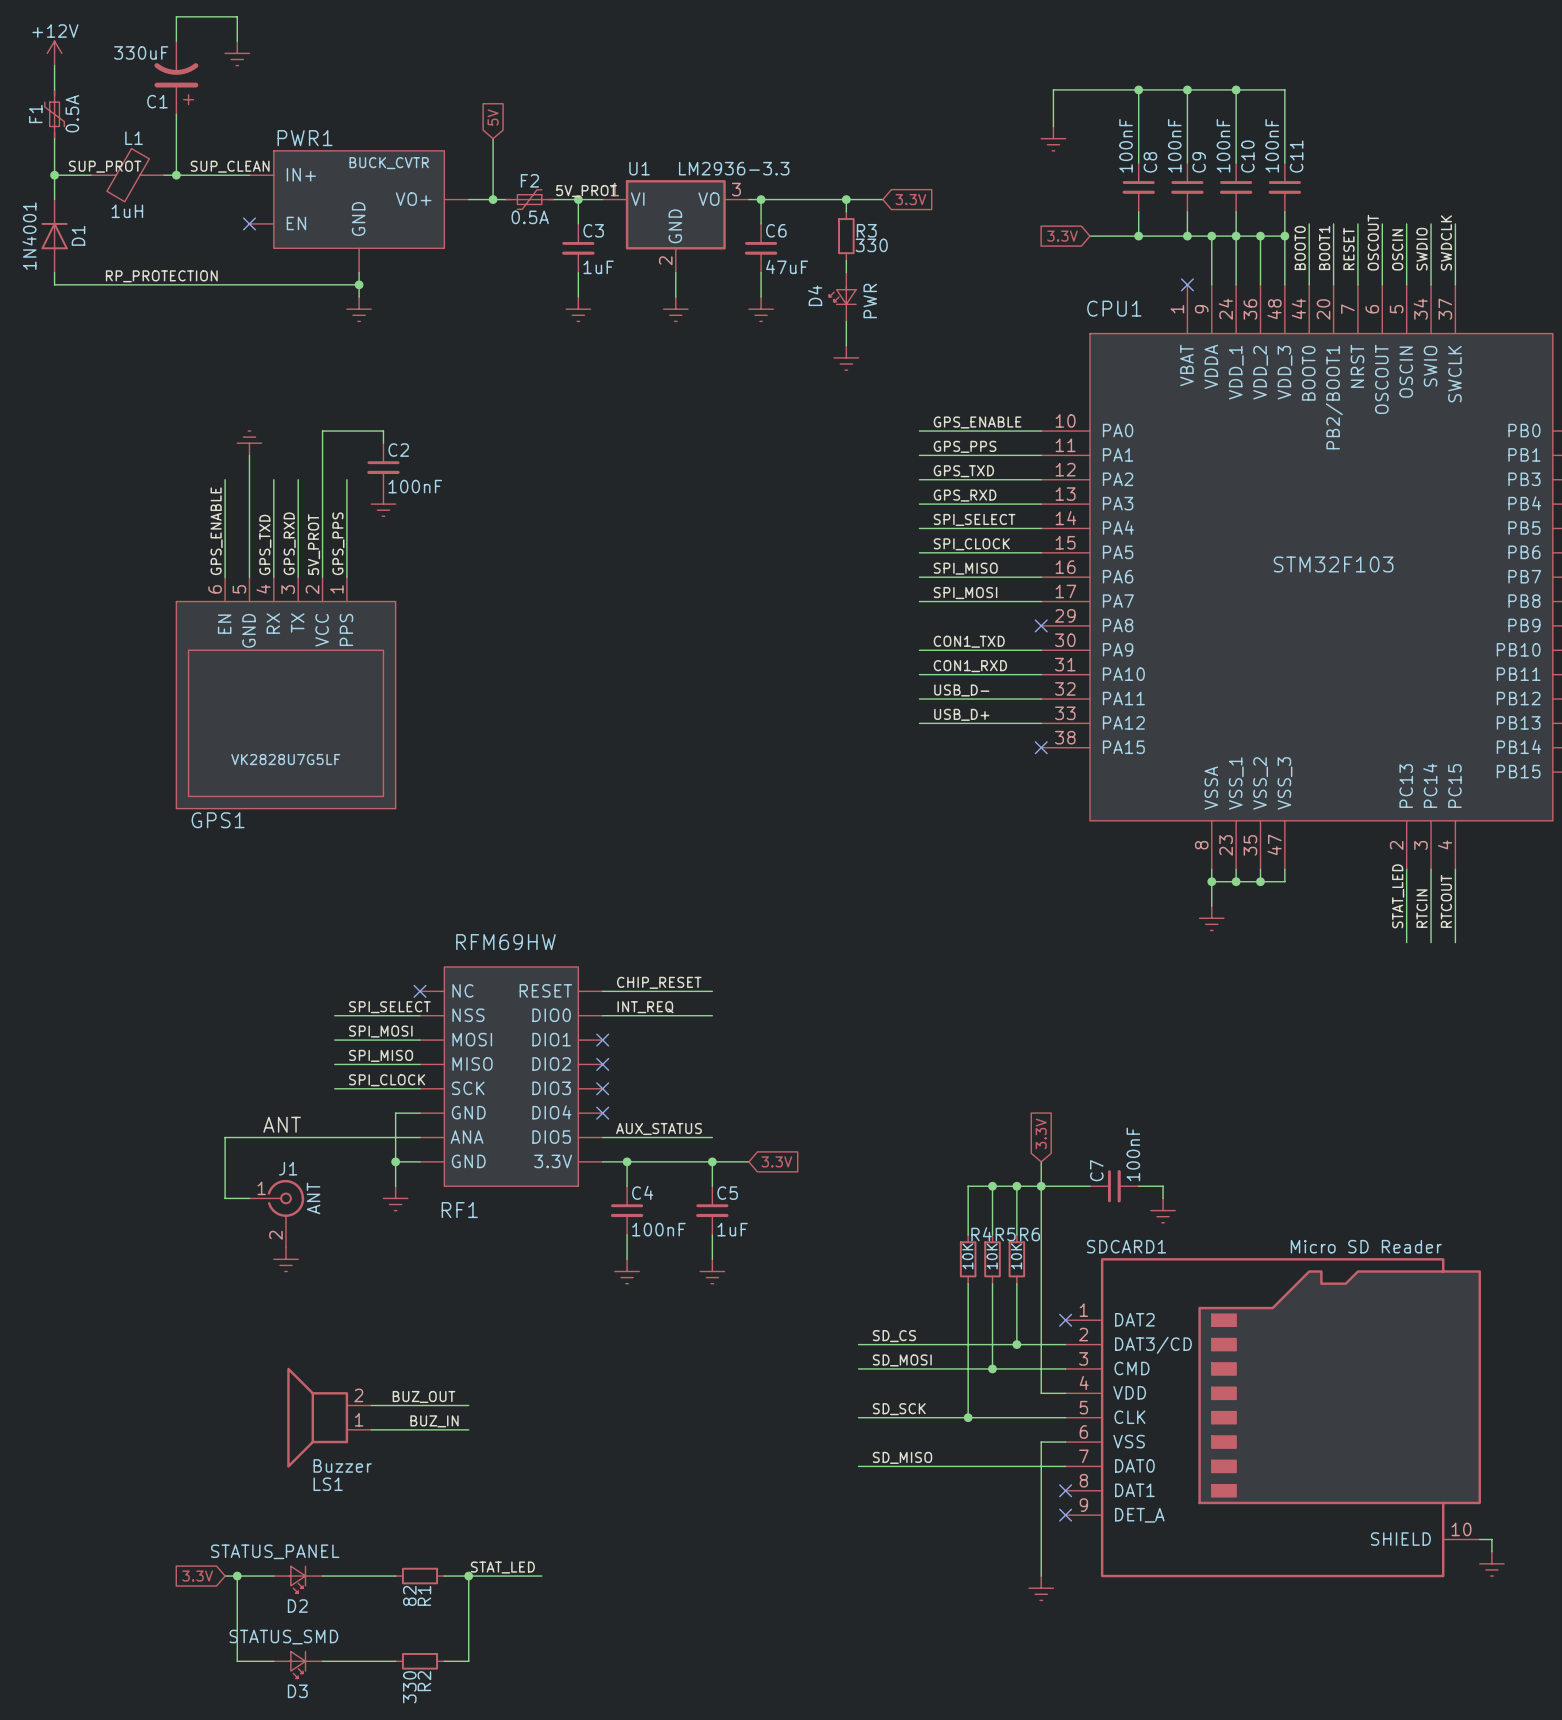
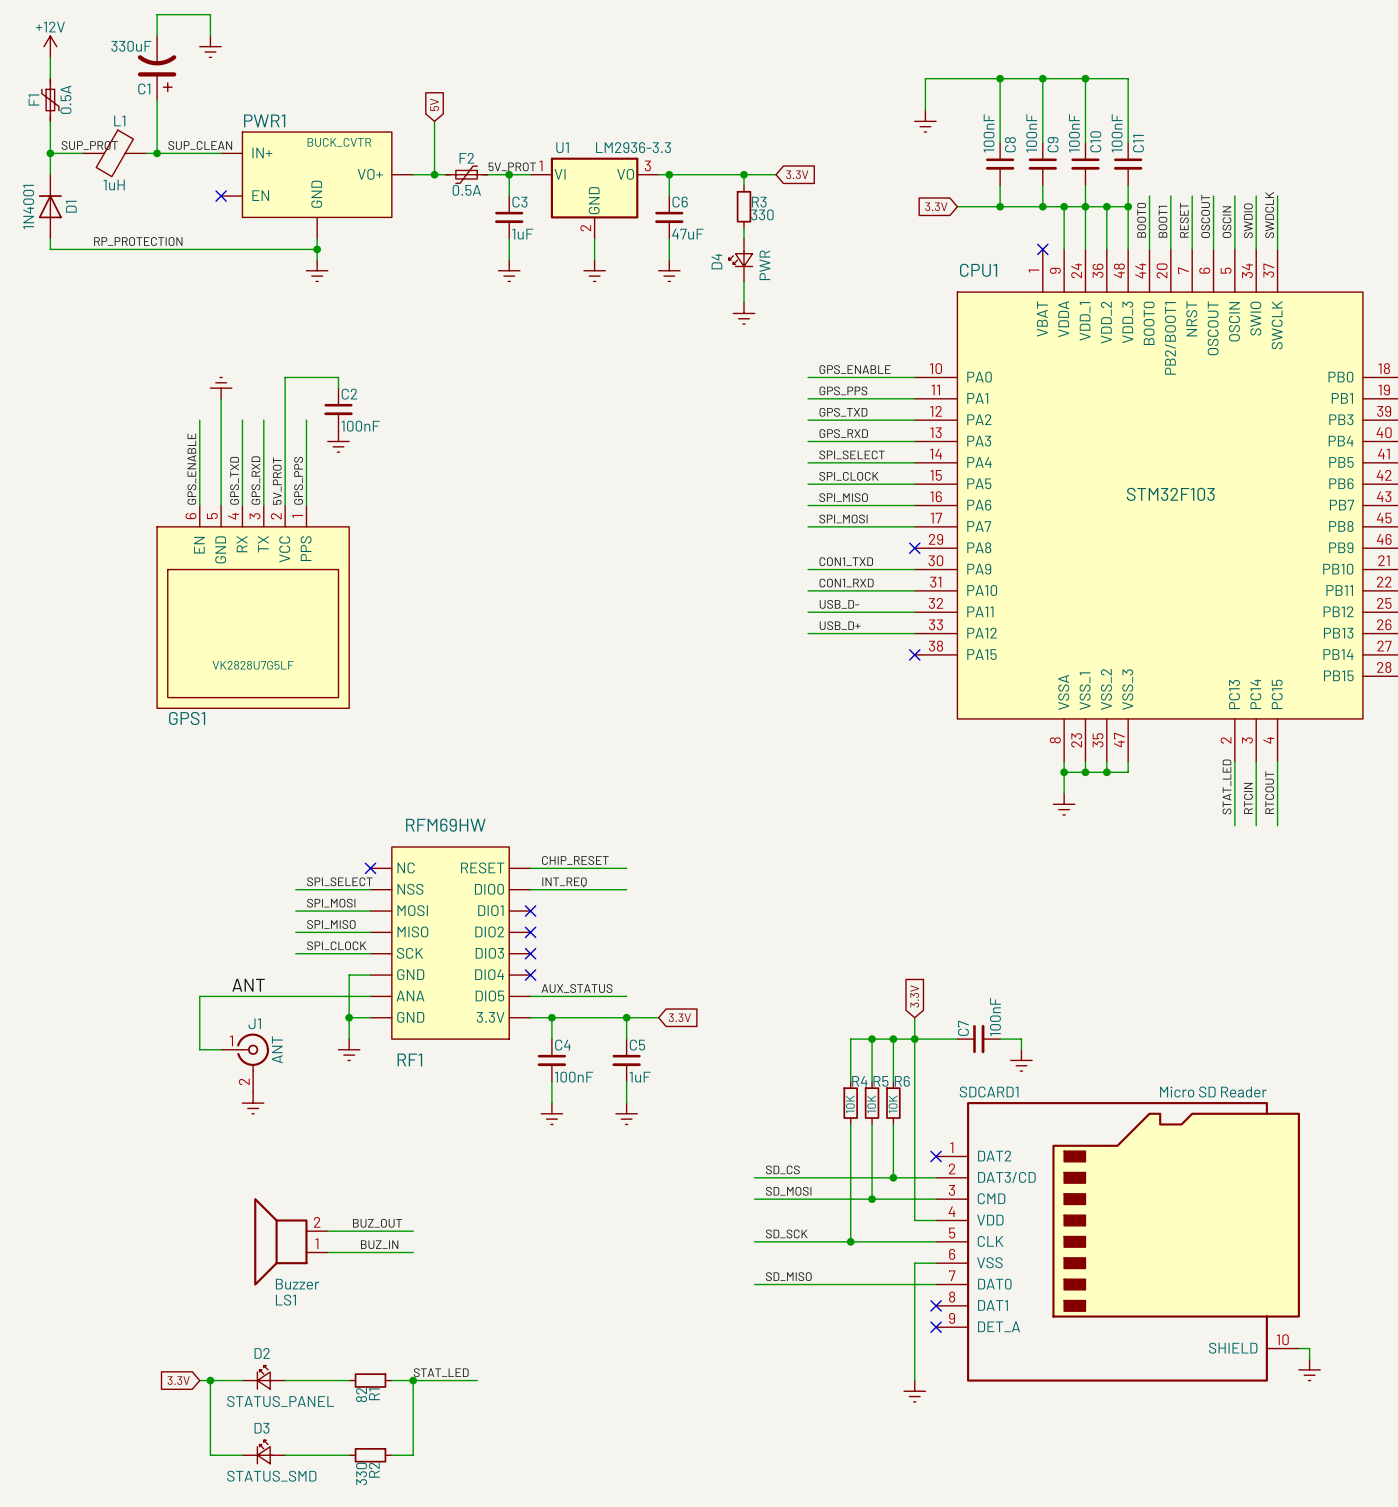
D2 rotation: 0° (296, 1579) -> 180° (264, 1377)
D3 rotation: 0° (296, 1664) -> 180° (264, 1452)

